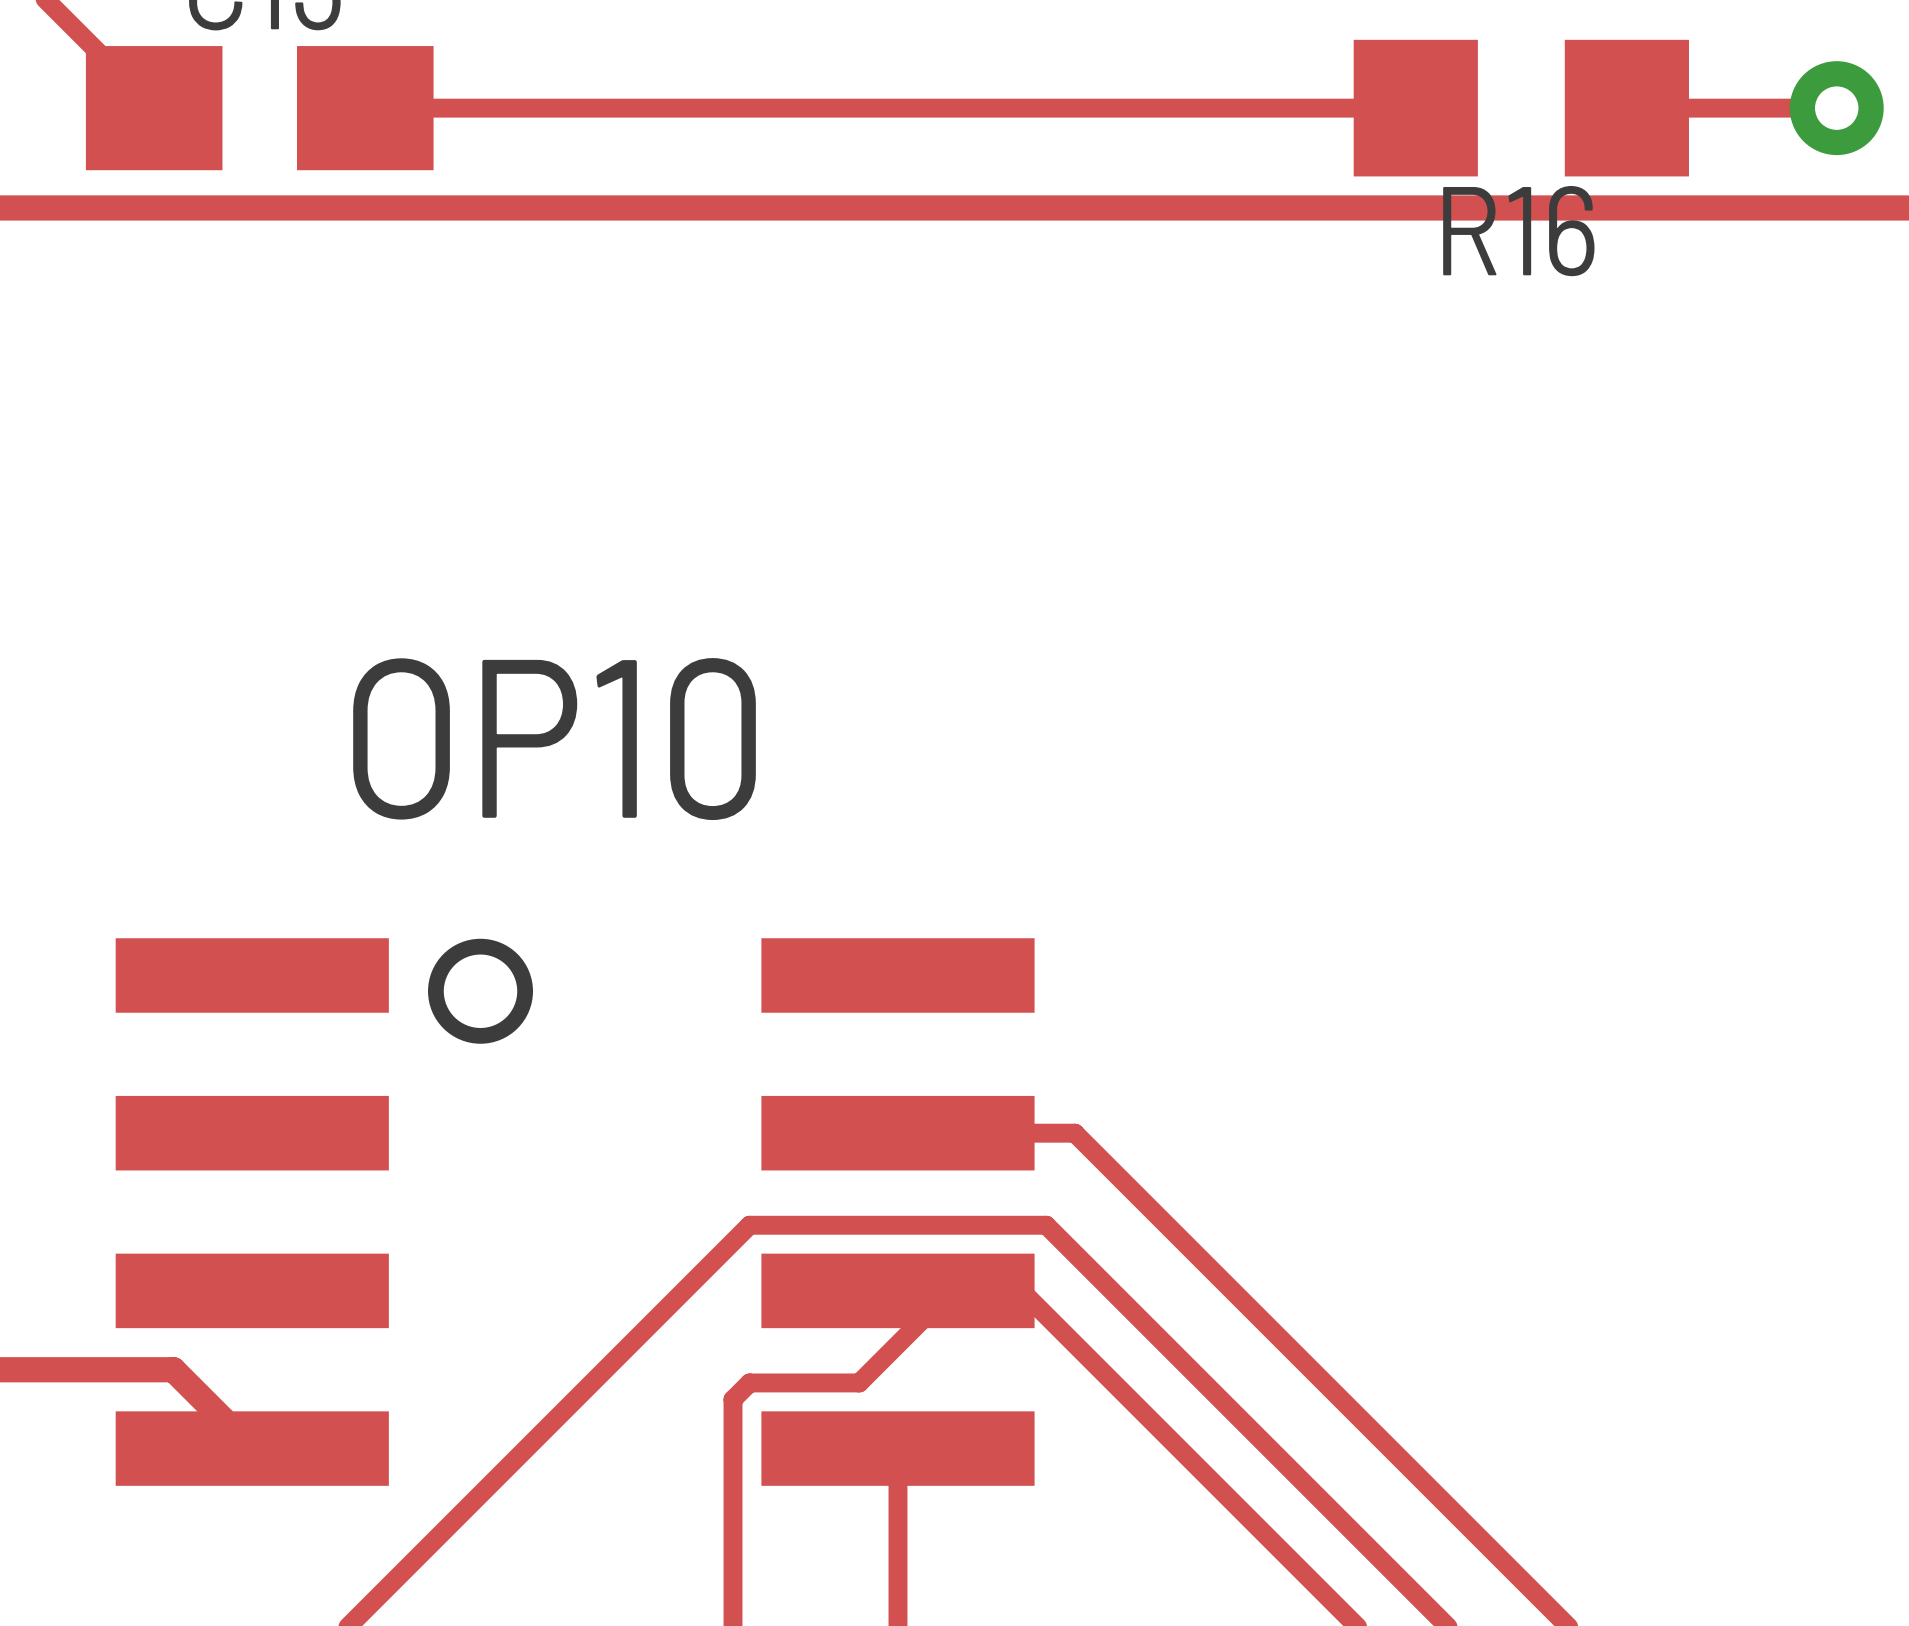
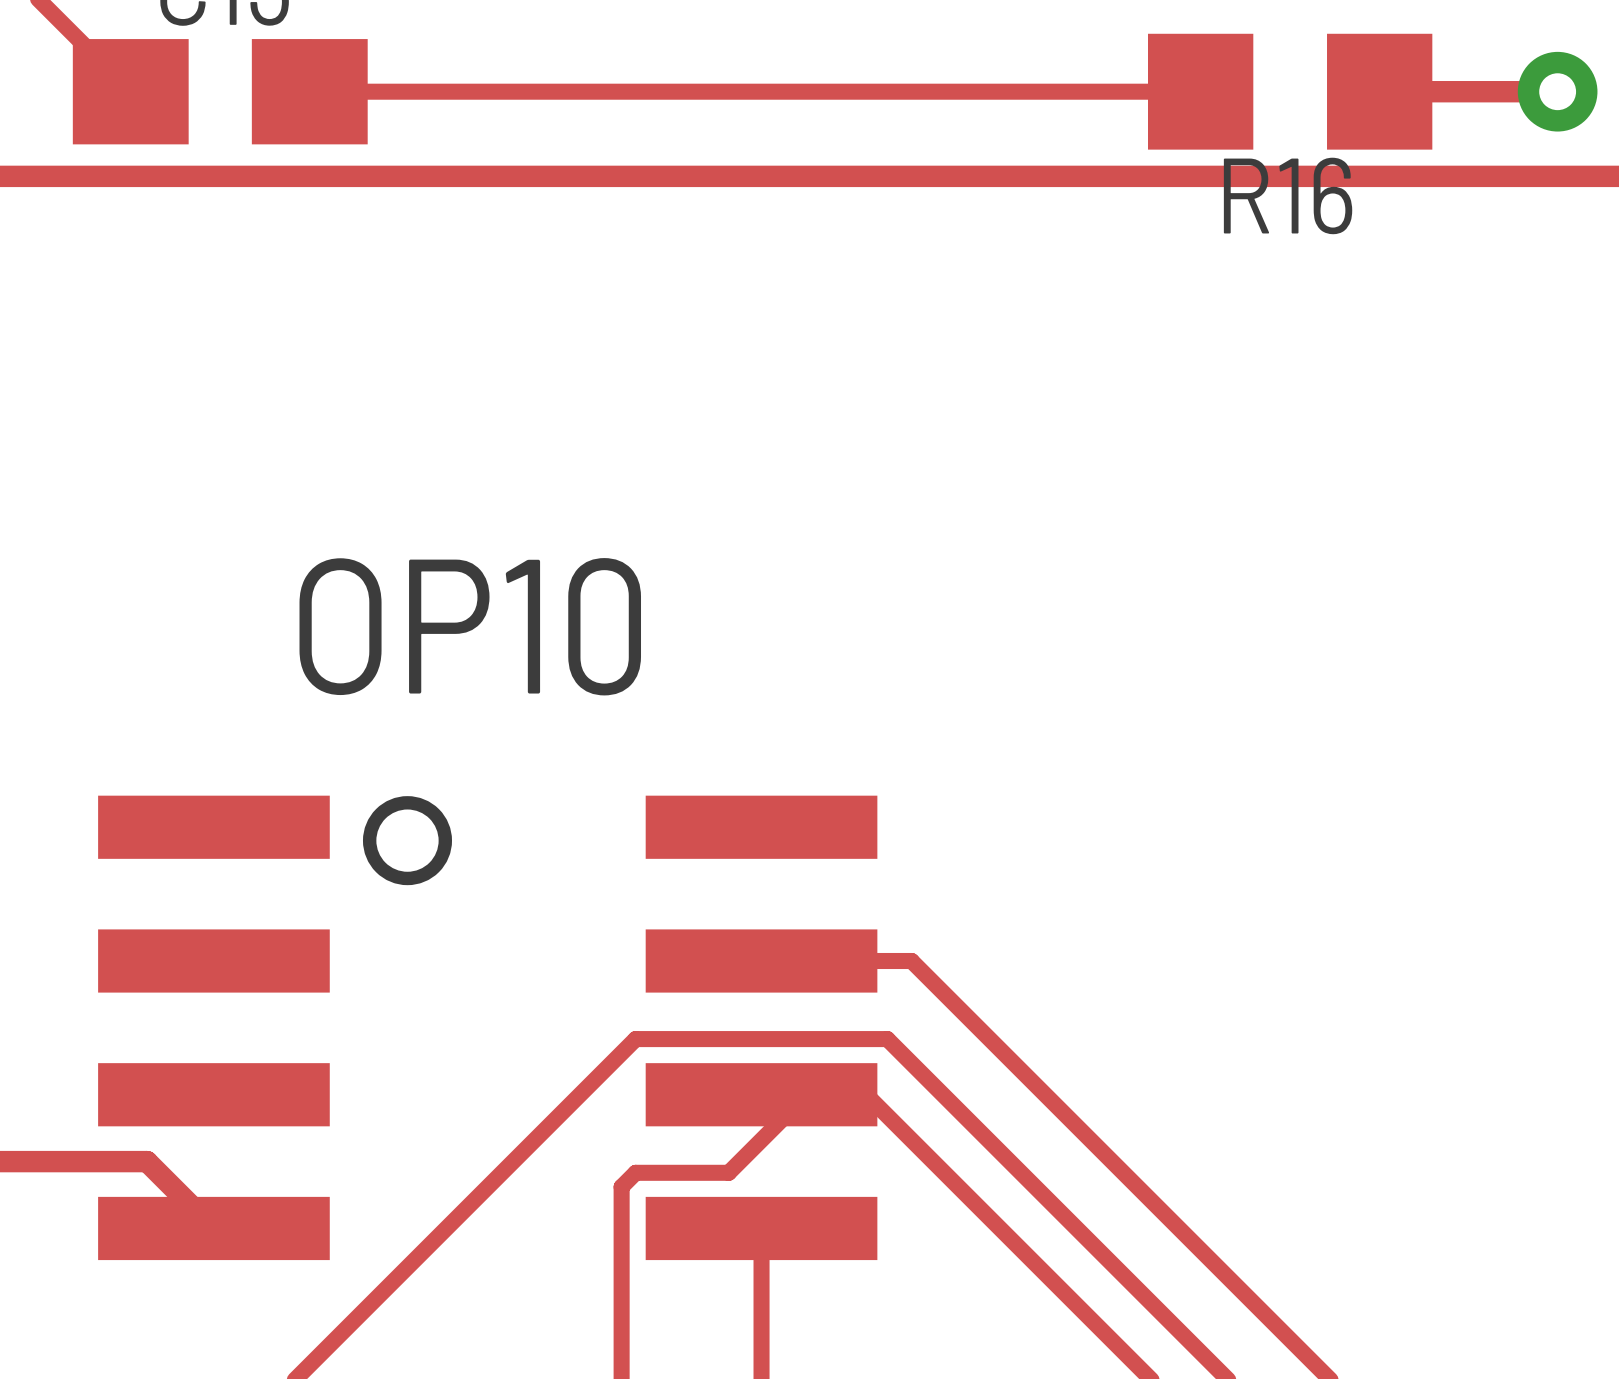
track width: thin (1626, 108) (1836, 108) -> thick (1379, 91) (1557, 91)

